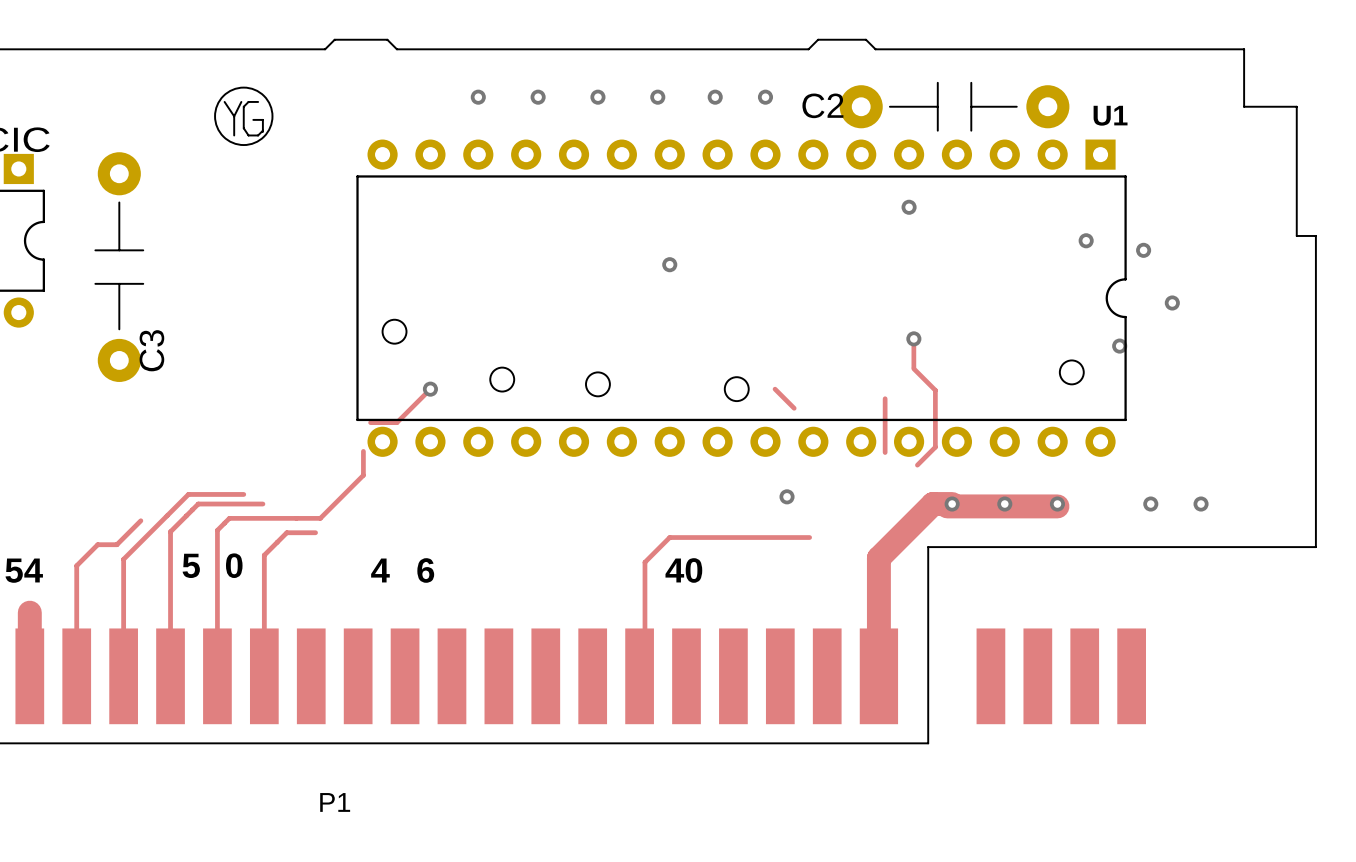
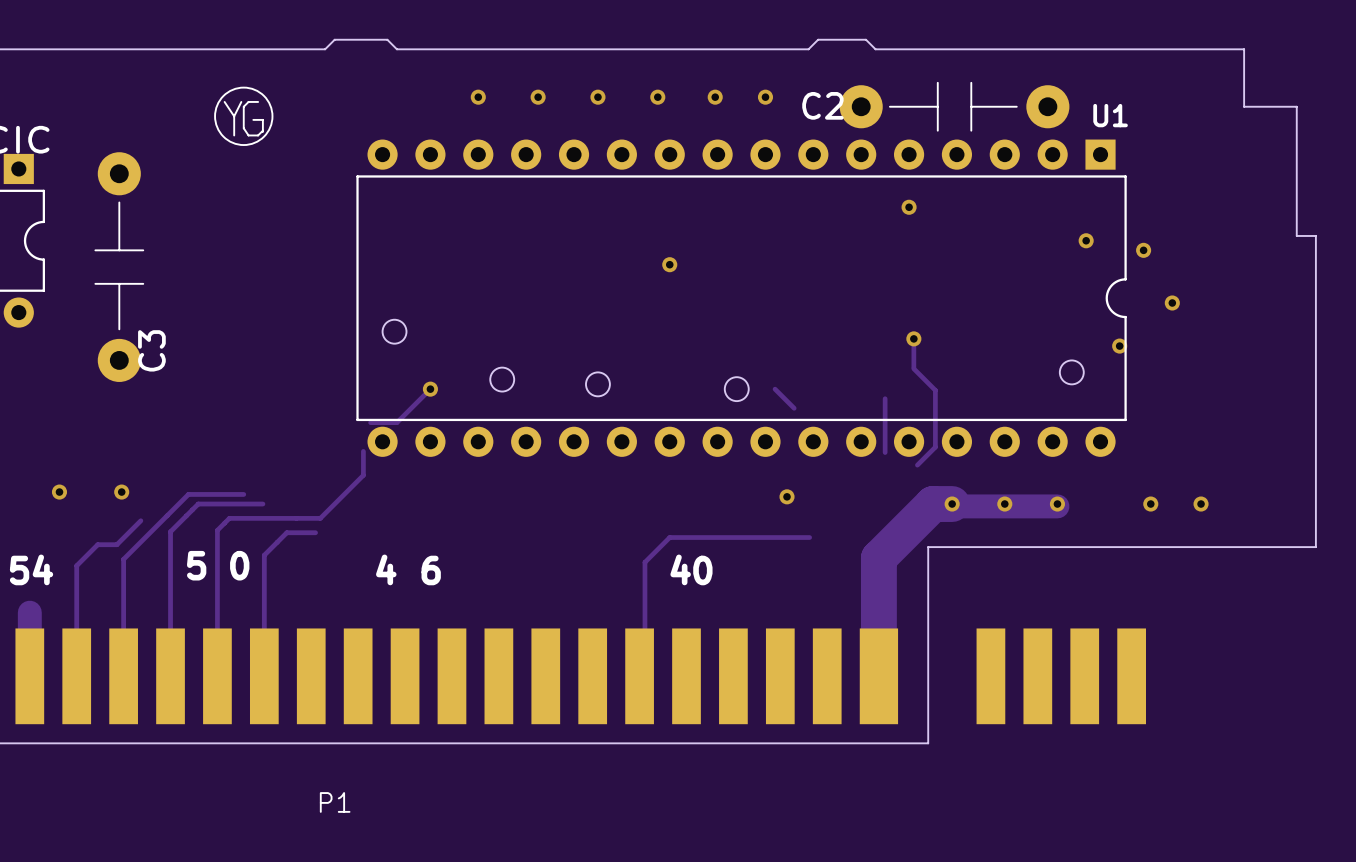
via: none -> (59, 492)
via: none -> (121, 492)
track width: thin (952, 504) (933, 504) (878, 558) (878, 676) -> thick (952, 504) (933, 504) (878, 558) (878, 676)

